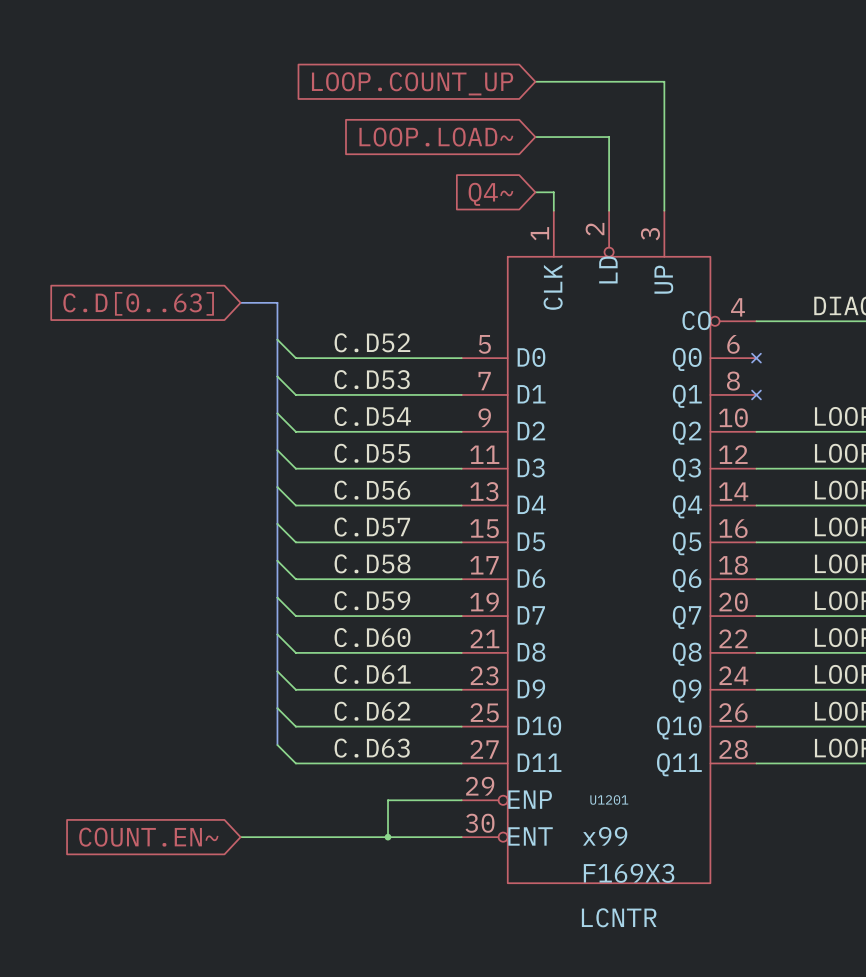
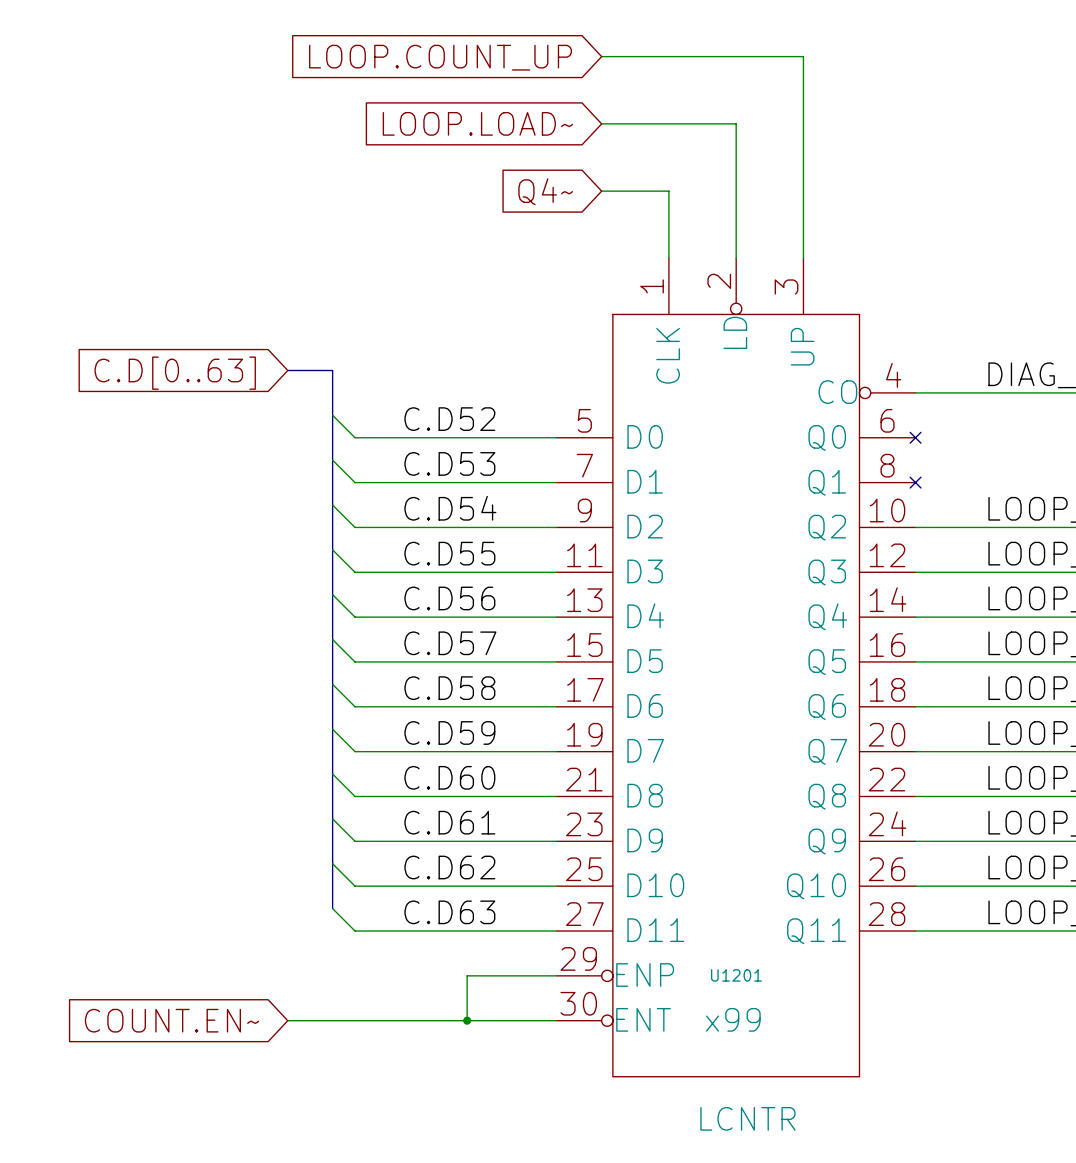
wire: (535, 81) (664, 81) -> (601, 56) (803, 56) (803, 101)
global label position: LOOP.COUNT_UP (412, 83) -> LOOP.COUNT_UP (440, 57)
global label position: LOOP.LOAD~ (436, 137) -> LOOP.LOAD~ (477, 123)
wire: (535, 137) (609, 137) -> (601, 123) (736, 123) (736, 168)
wire: (535, 192) (553, 192) -> (601, 191) (668, 191) (668, 235)
global label position: Q4~ (490, 194) -> Q4~ (545, 191)
U1201 value: F169X3 (629, 873) -> none

